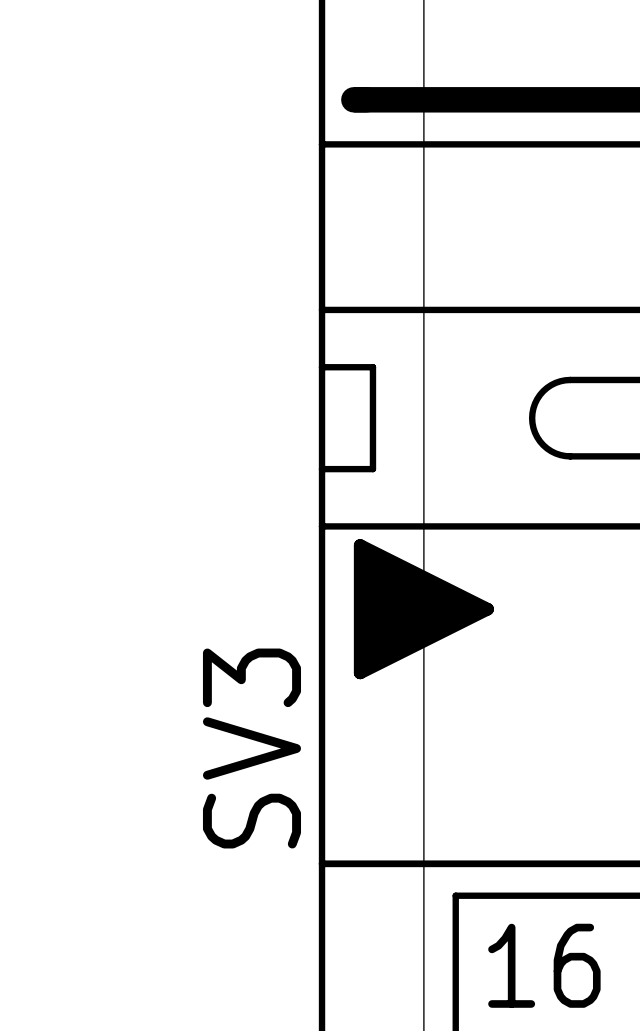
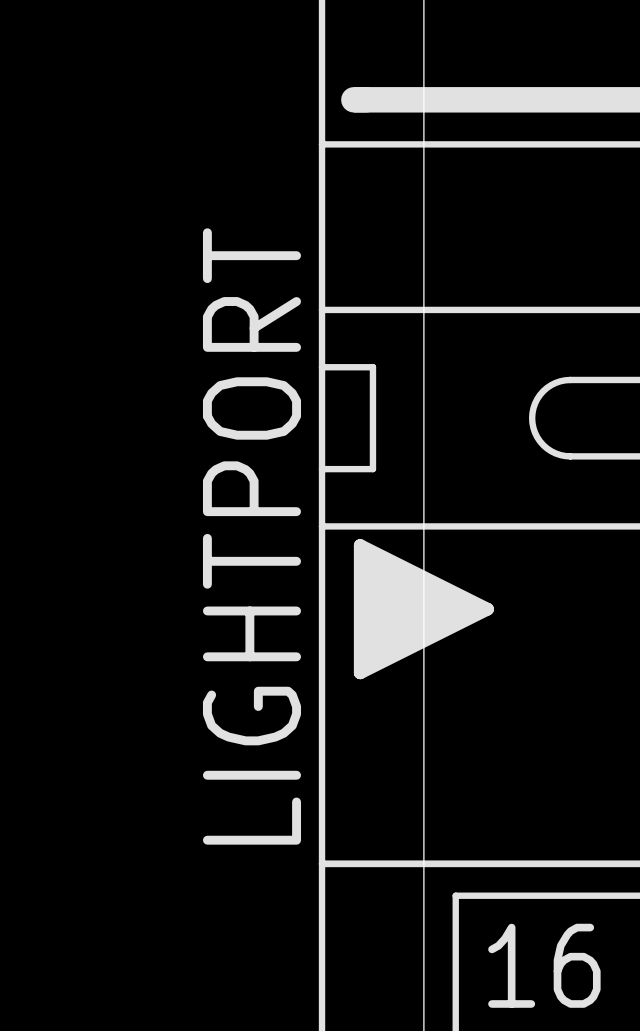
SV3 name: SV3 (251, 748) -> LIGHTPORT (251, 536)

